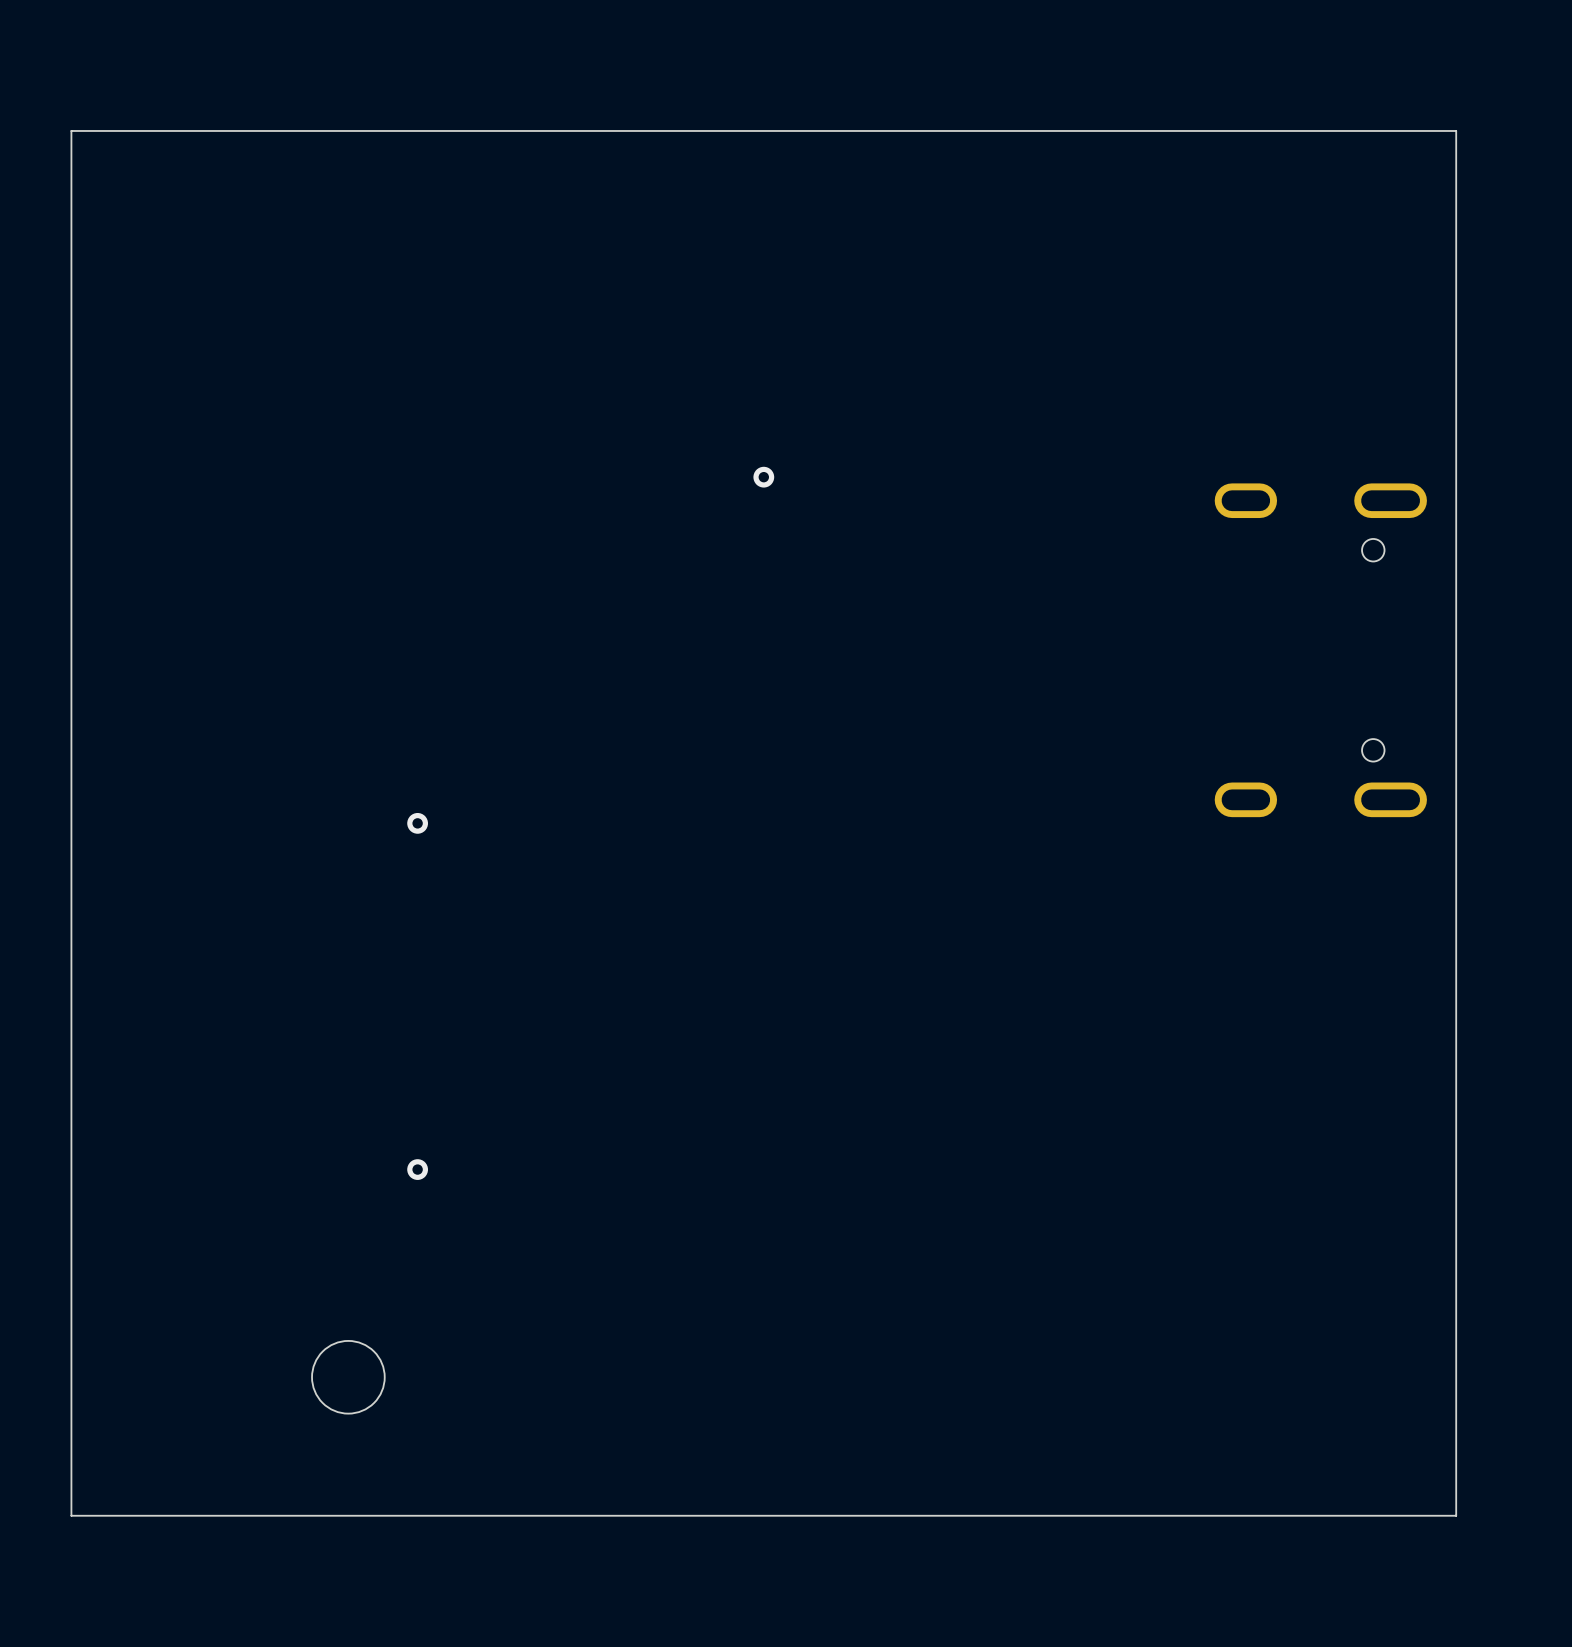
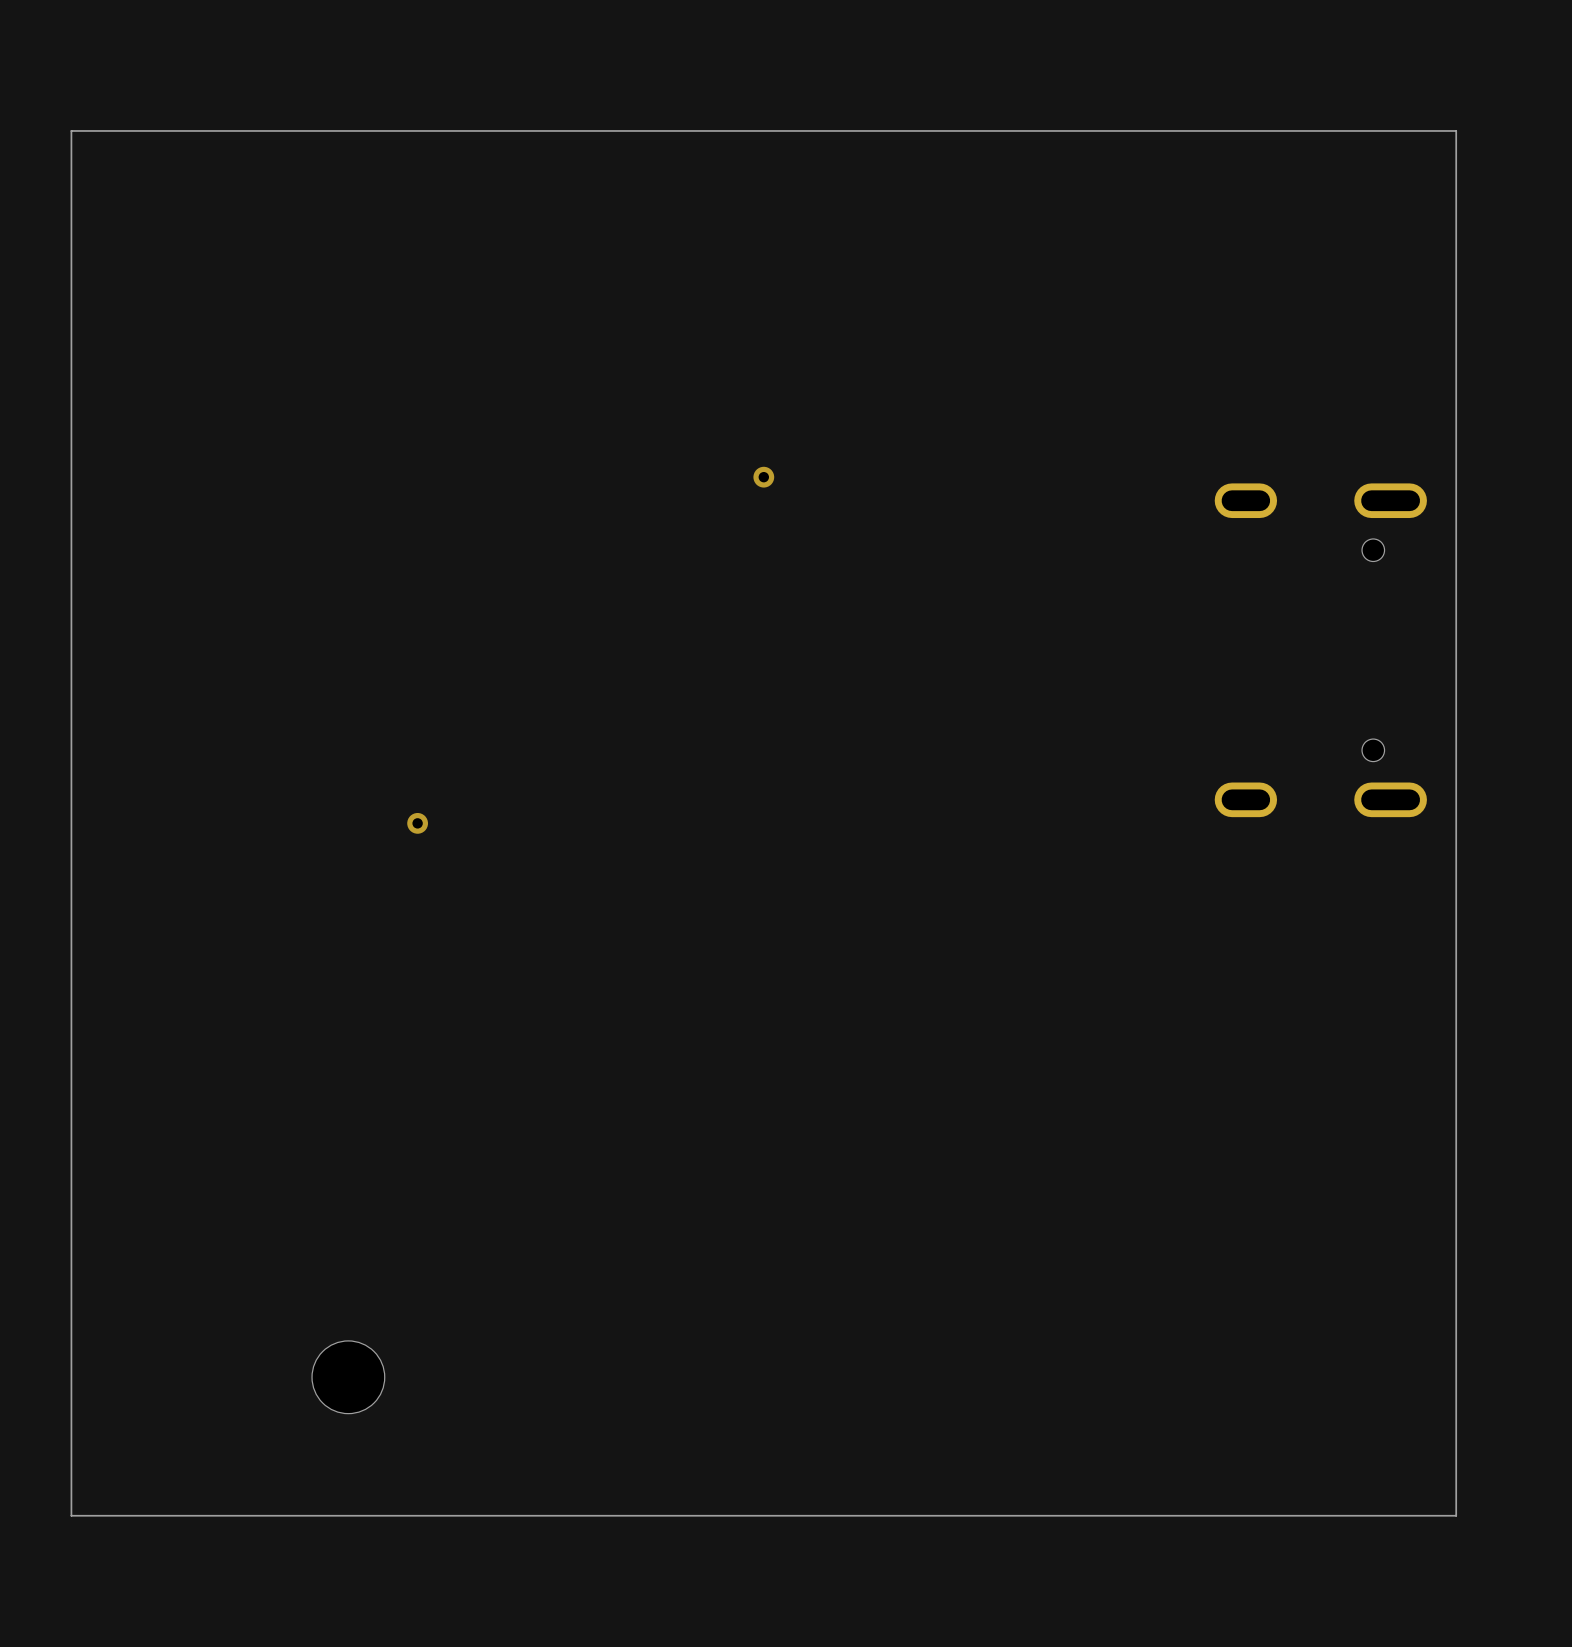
via: (417, 1169) -> none

